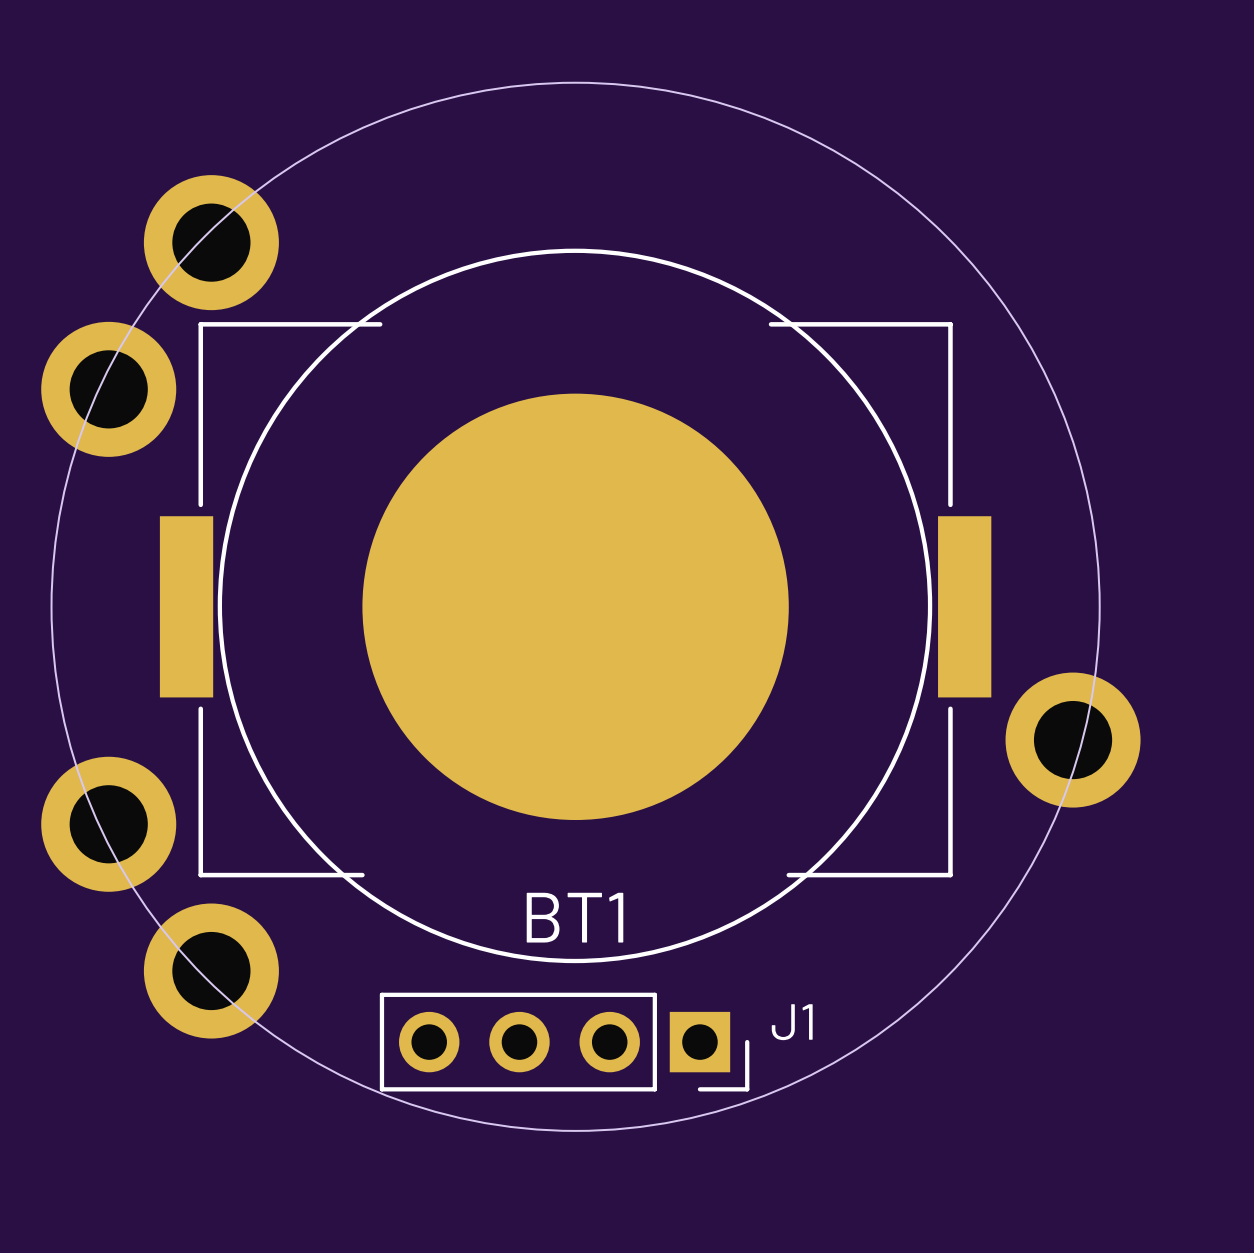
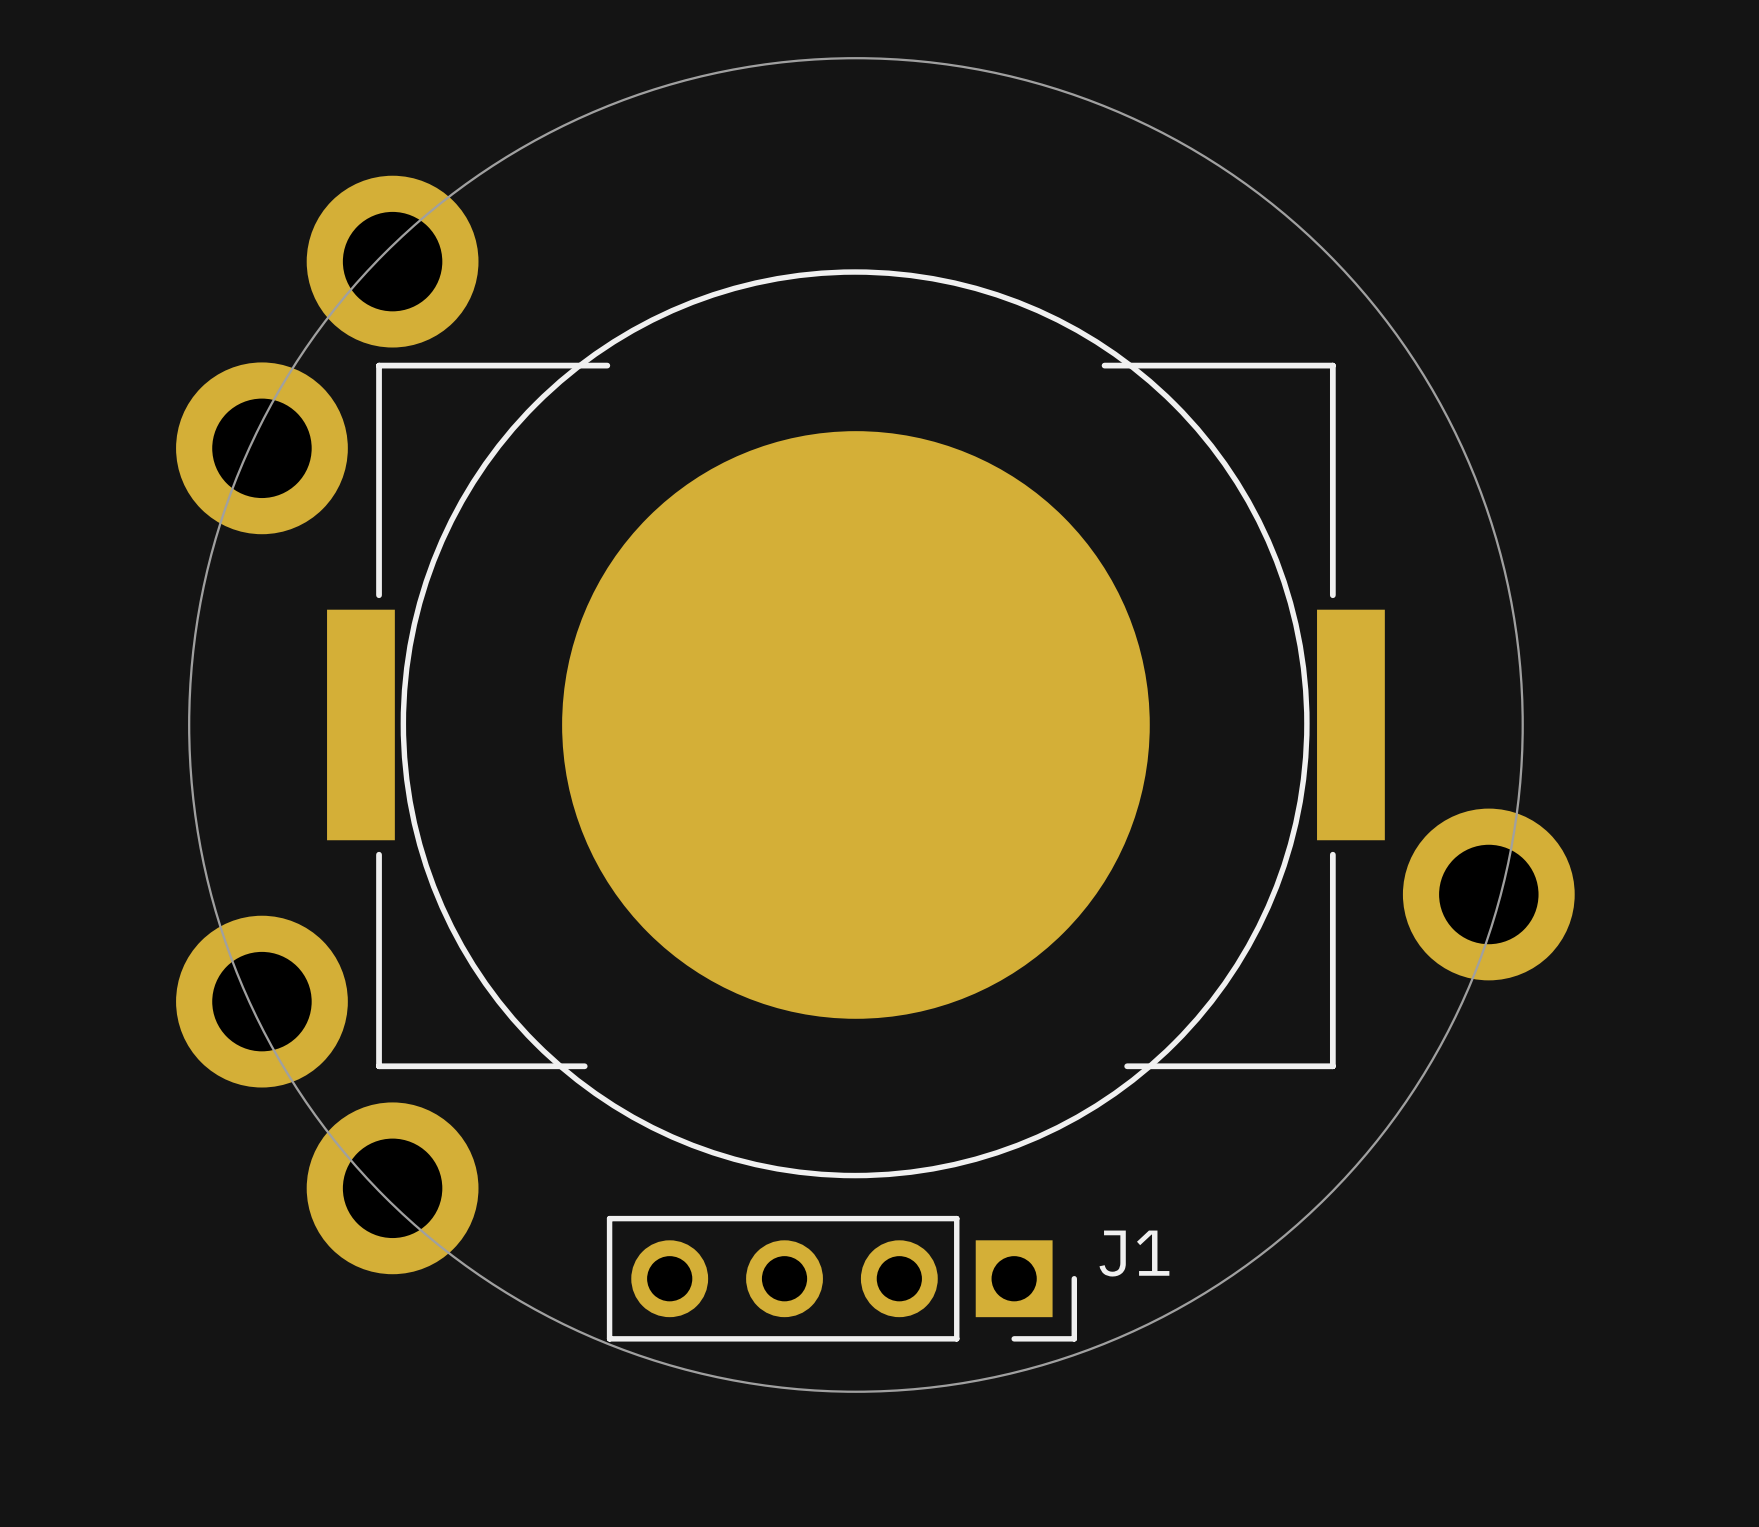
BT1: (575, 599) -> none
part: none -> (855, 715)

